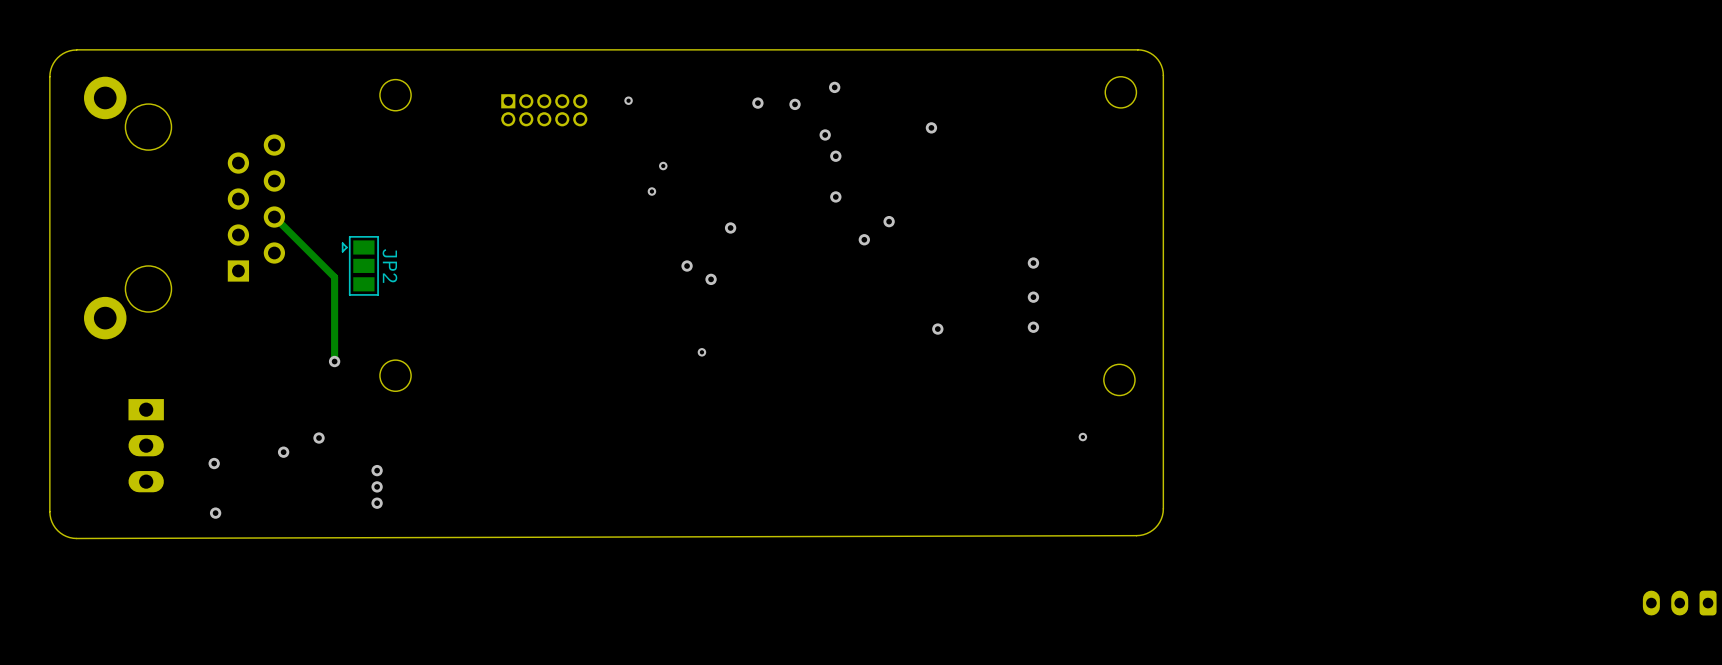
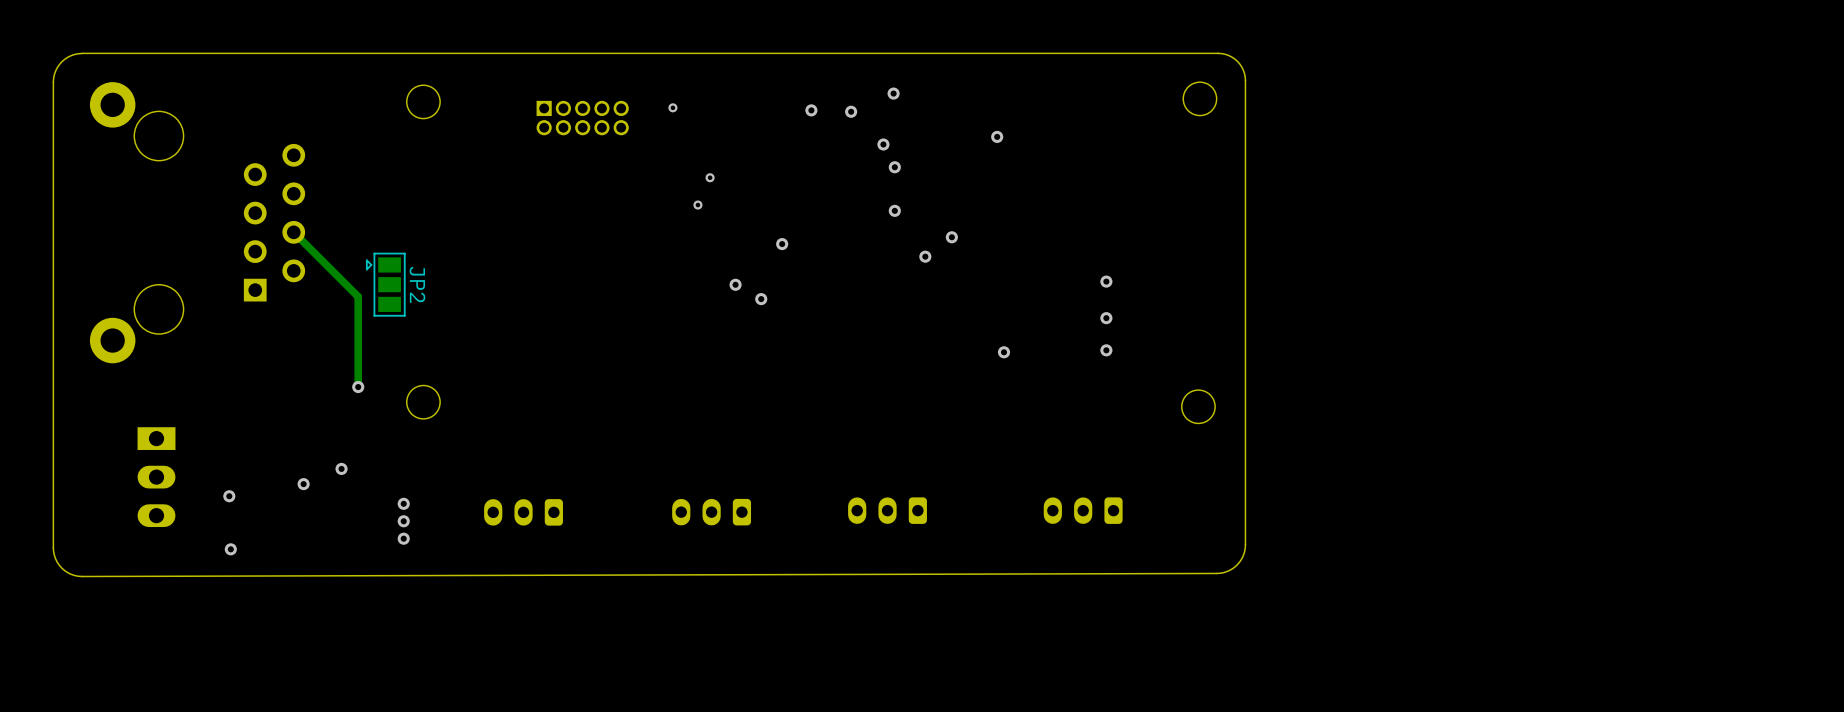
via: (701, 352) -> none
via: (1082, 437) -> none
part: none -> (887, 510)
part: none -> (1083, 510)
part: none -> (523, 512)
part: none -> (711, 512)
part: (1679, 603) -> none

